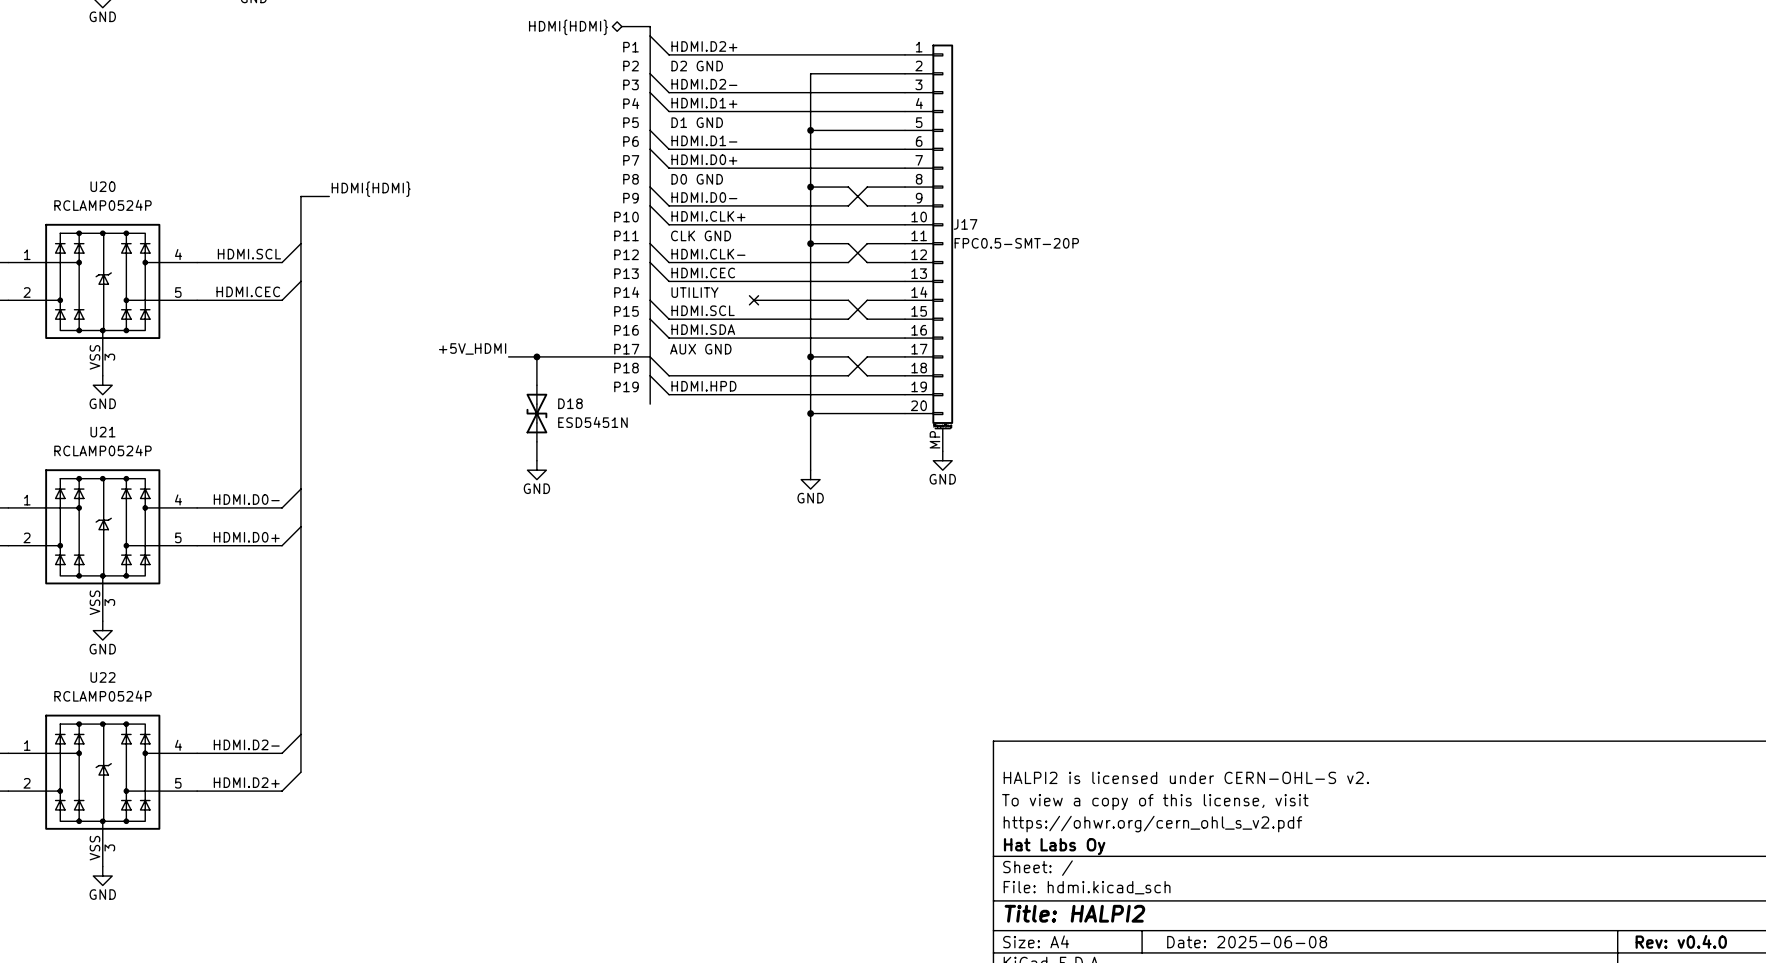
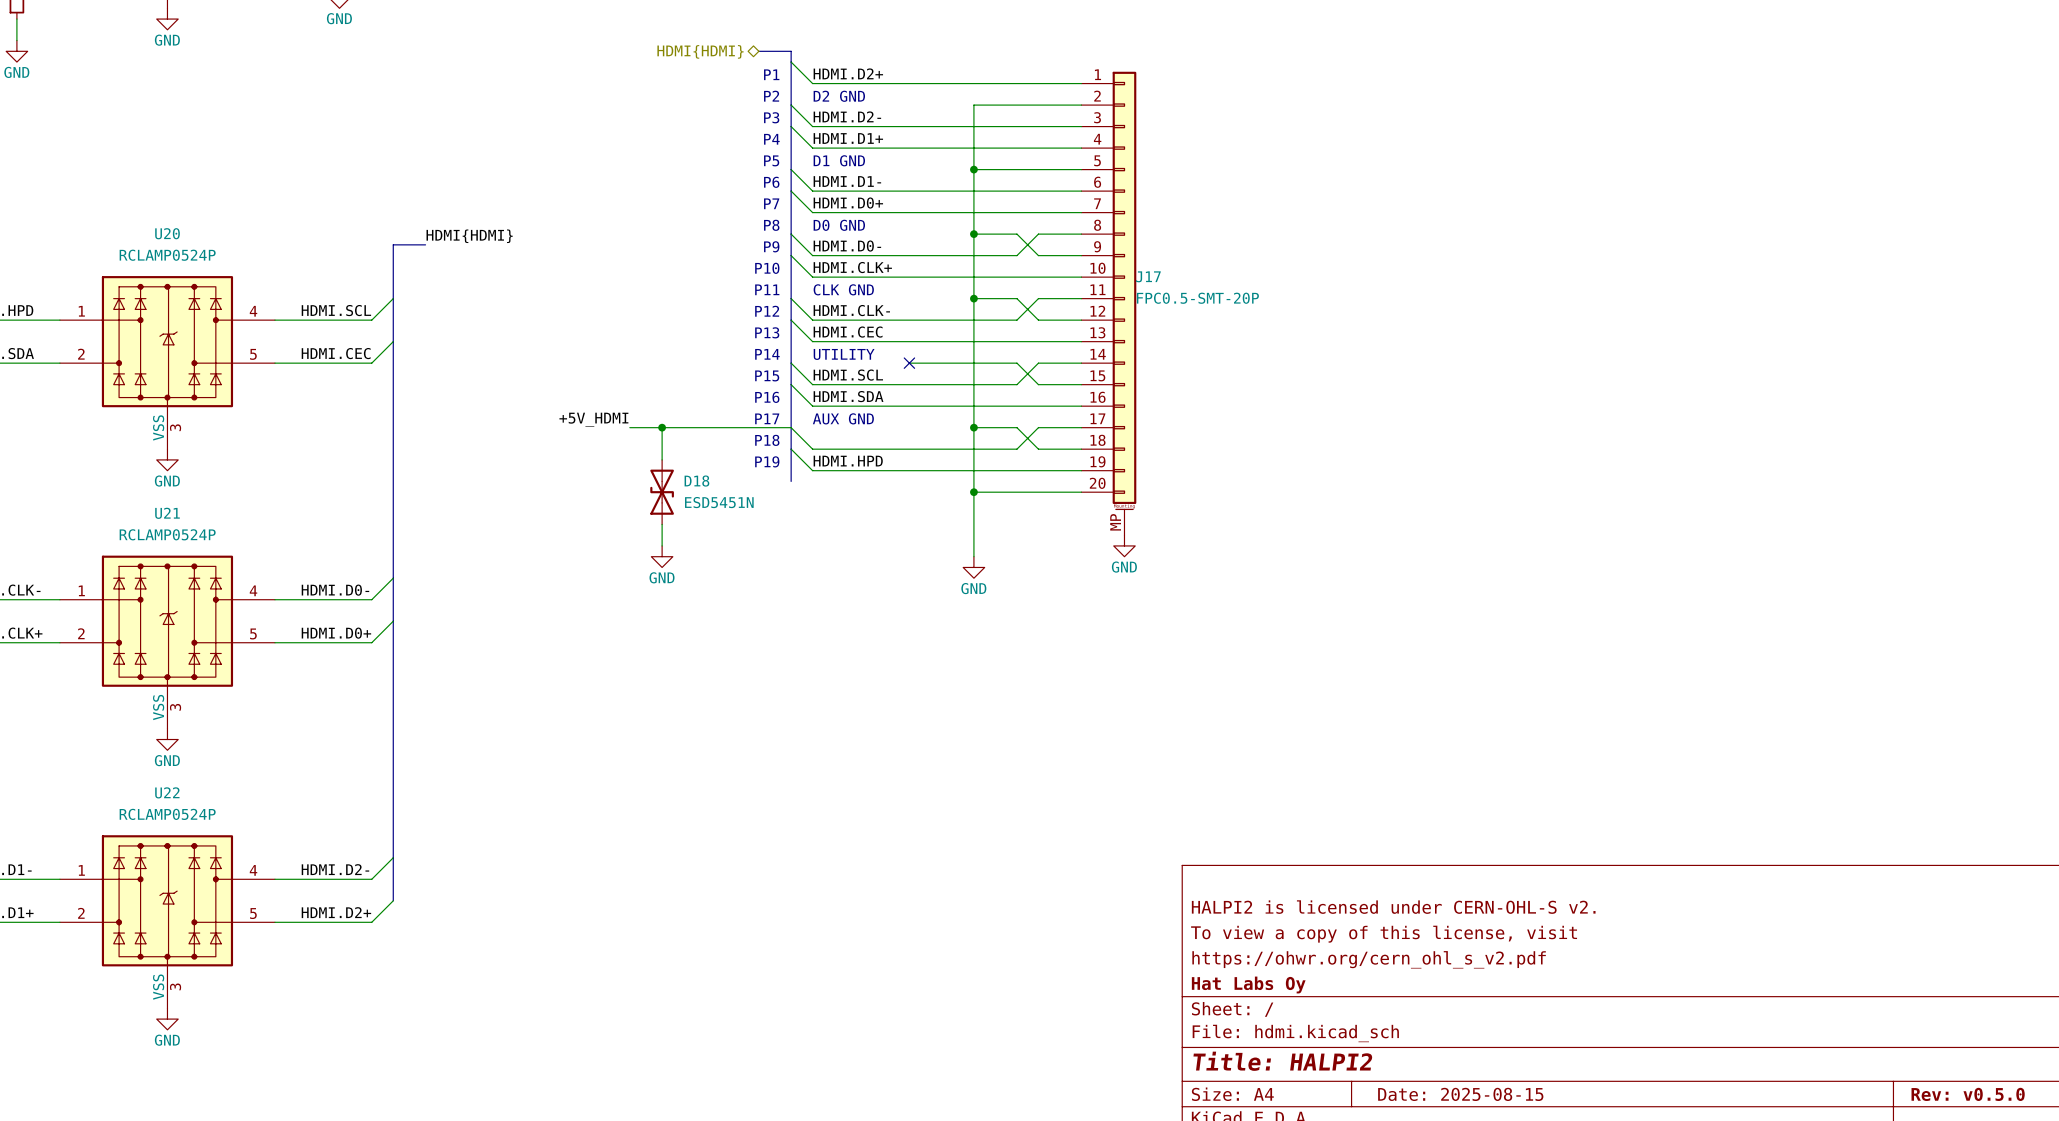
title block: Rev: v0.4.0 (1681, 941) -> Rev: v0.5.0 (1968, 1094)
title block: Date: 2025-06-08 (1247, 942) -> Date: 2025-08-15 (1460, 1094)

